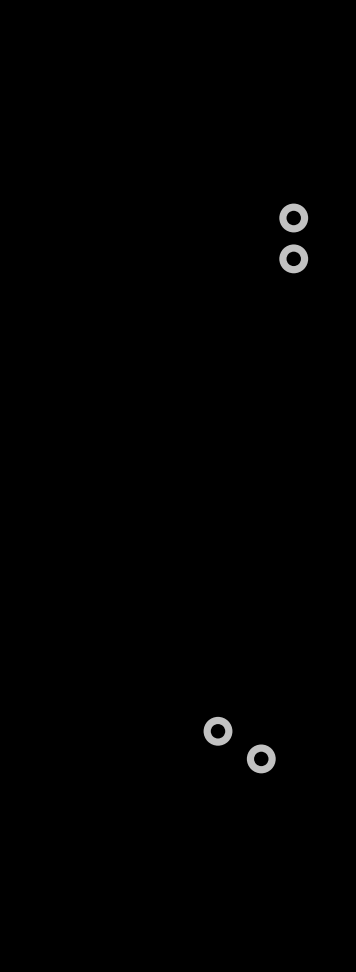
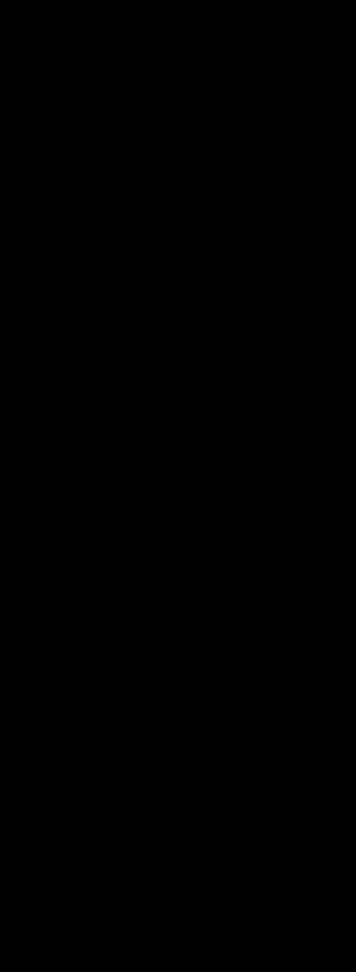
via: (293, 218) -> none
via: (293, 258) -> none
via: (218, 731) -> none
via: (261, 758) -> none

